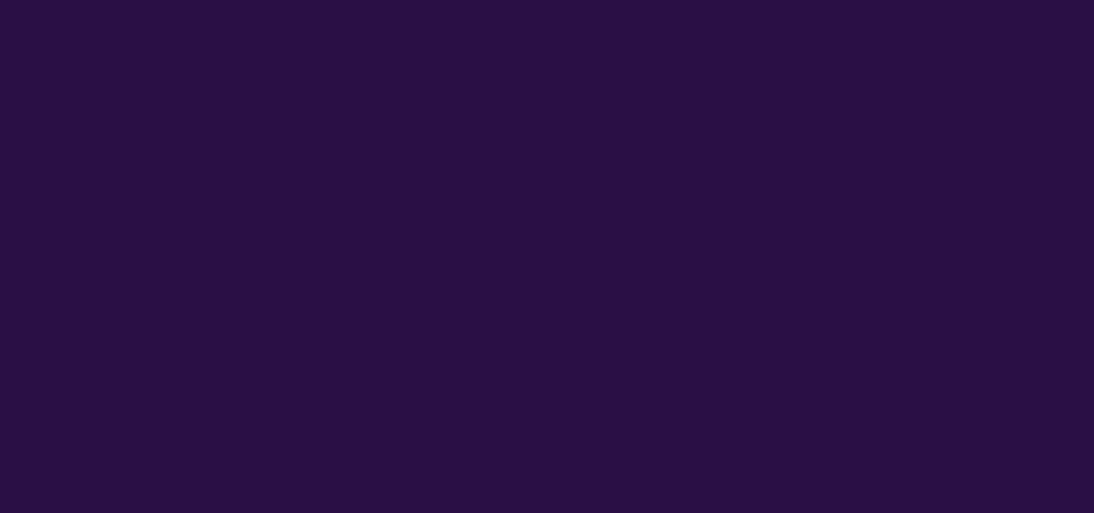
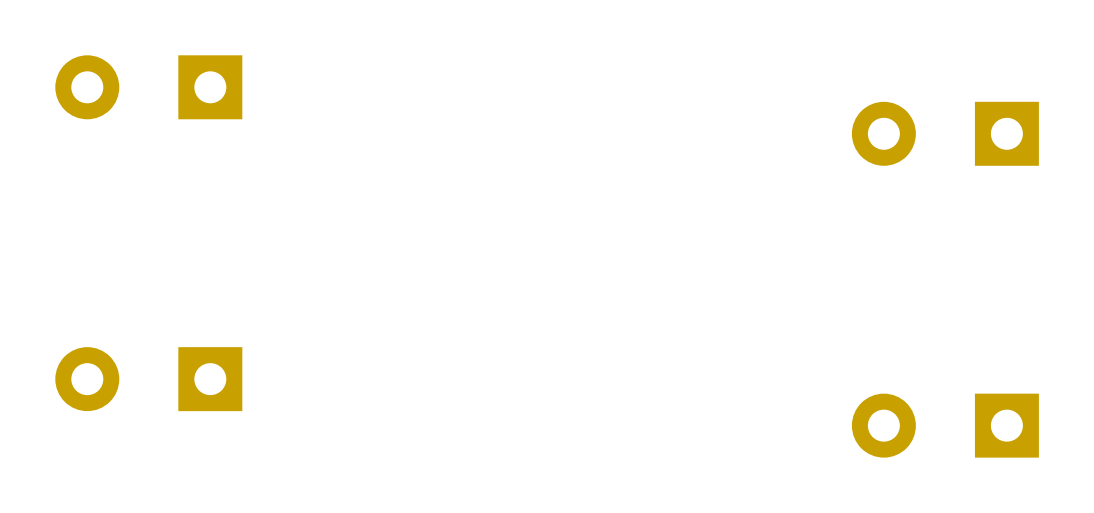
part: none -> (148, 87)
part: none -> (945, 133)
part: none -> (148, 379)
part: none -> (945, 425)

